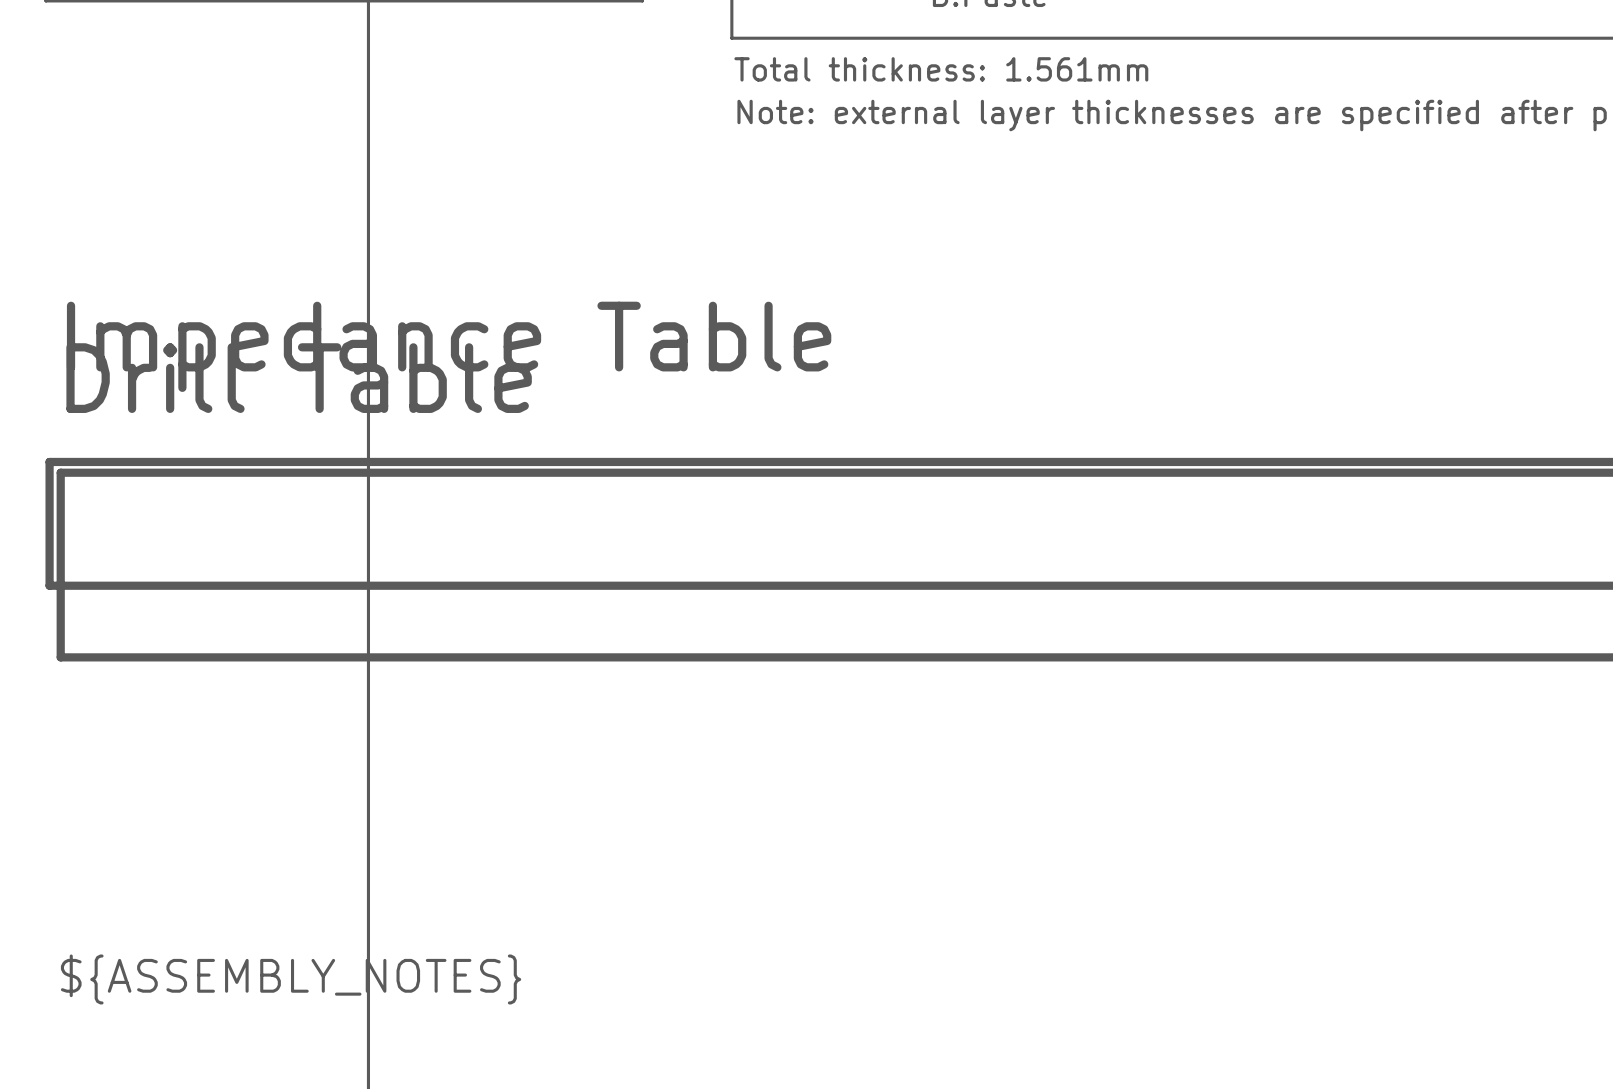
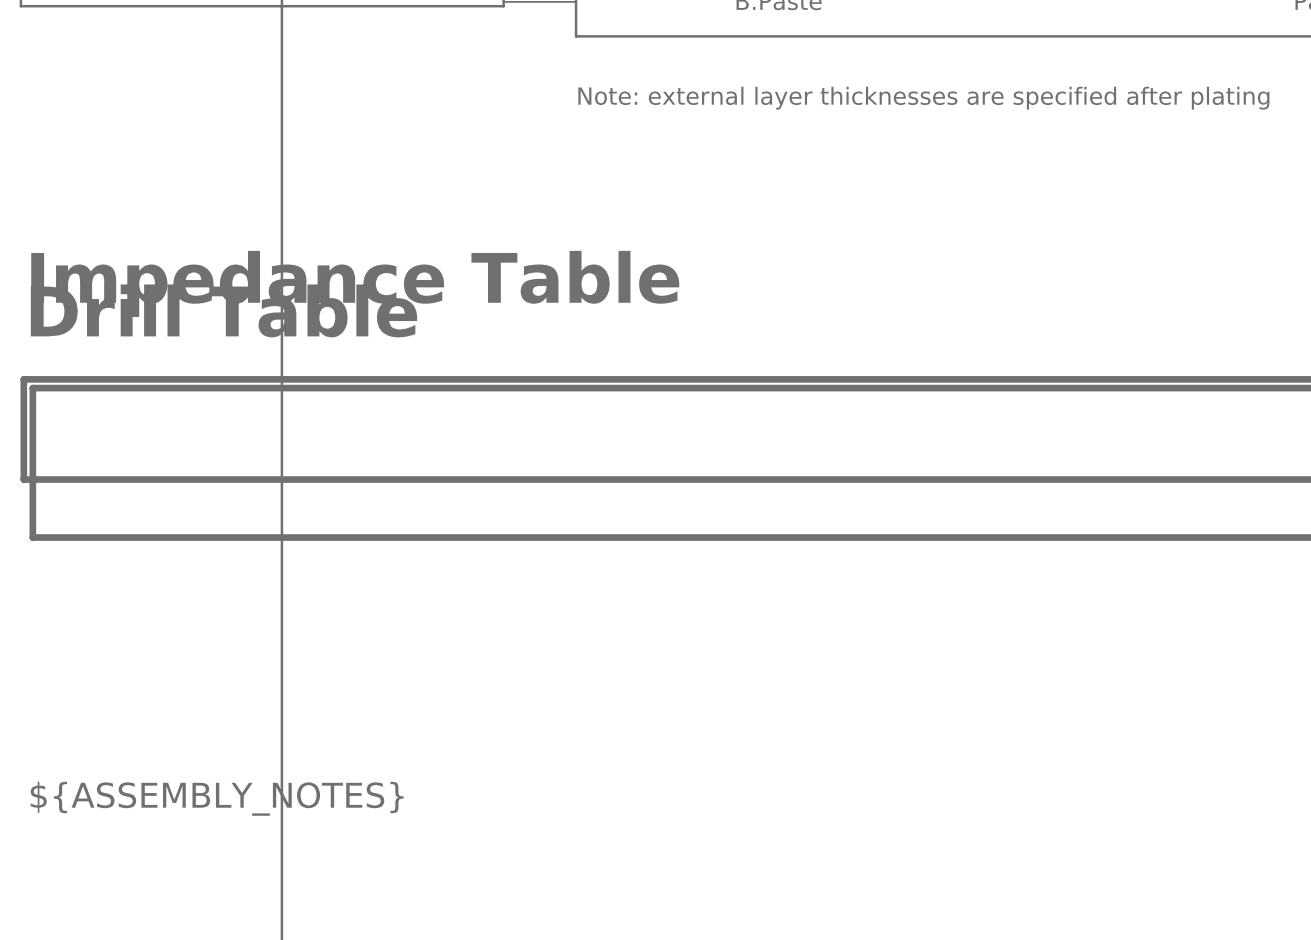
text: Total thickness: 1.561mm (941, 69) -> none

